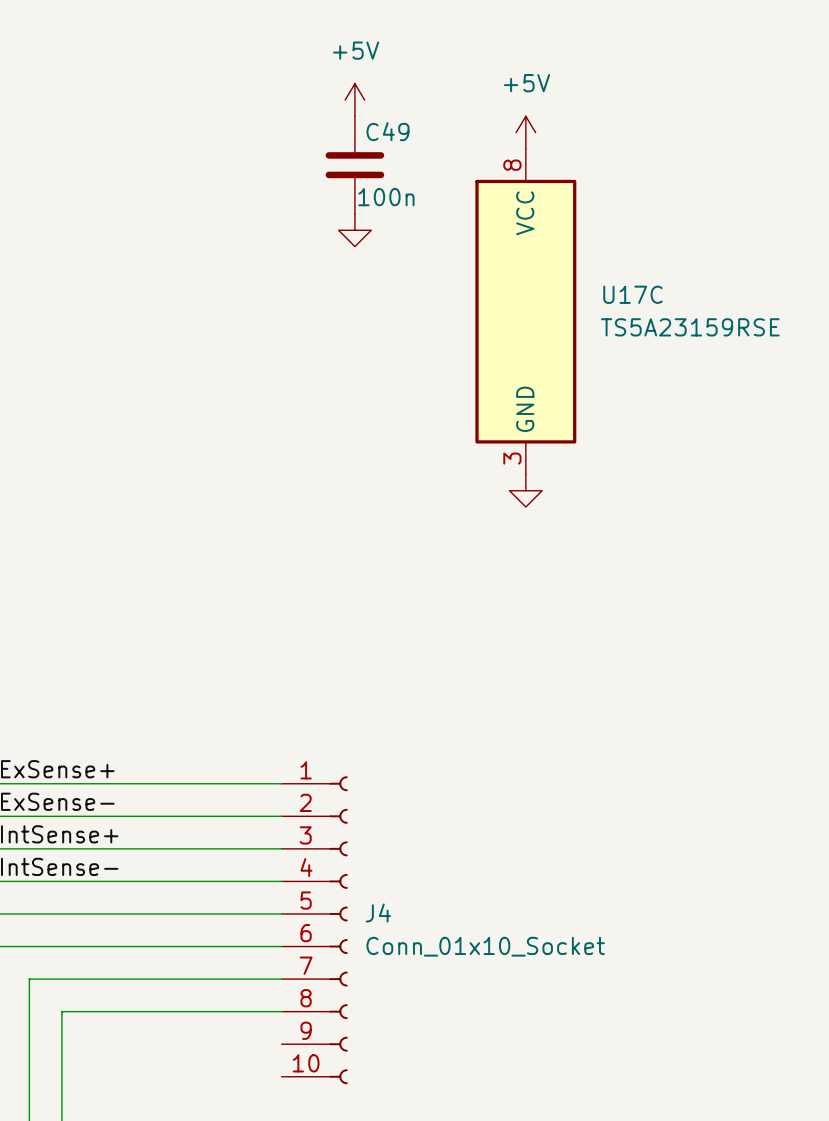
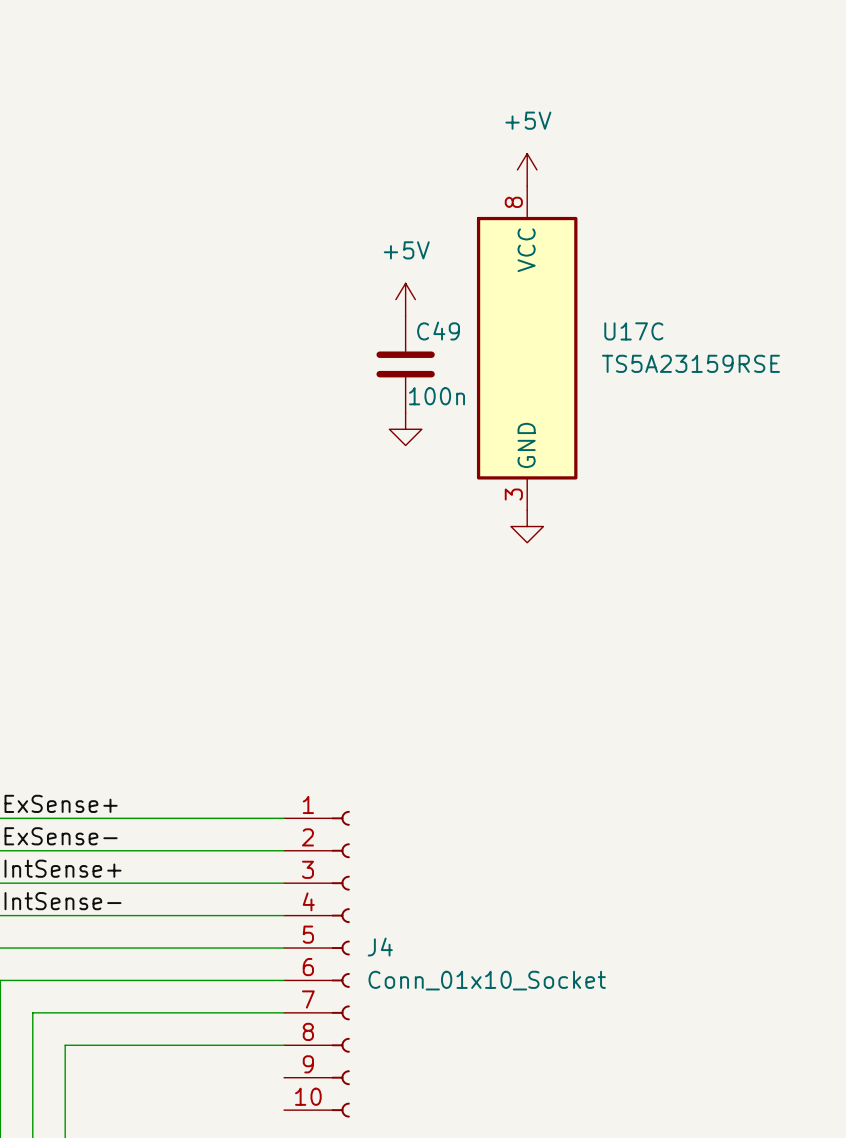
power symbol position: +5V (354, 100) -> +5V (405, 299)
C49 position: (354, 165) -> (405, 364)
power symbol position: (354, 230) -> (405, 429)

